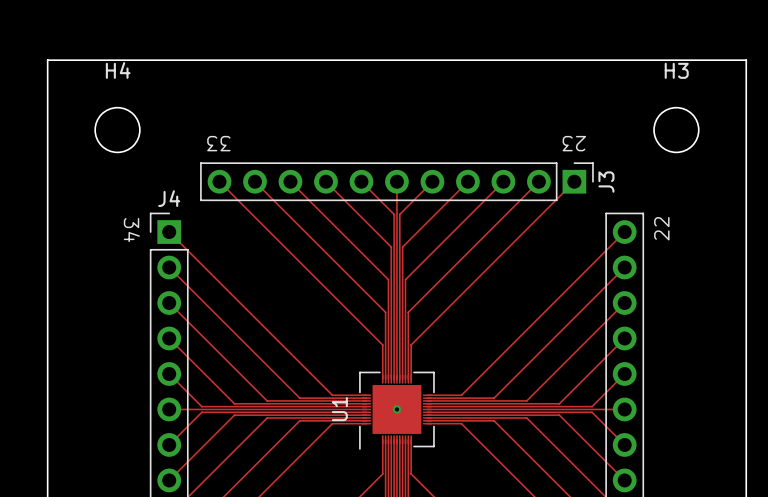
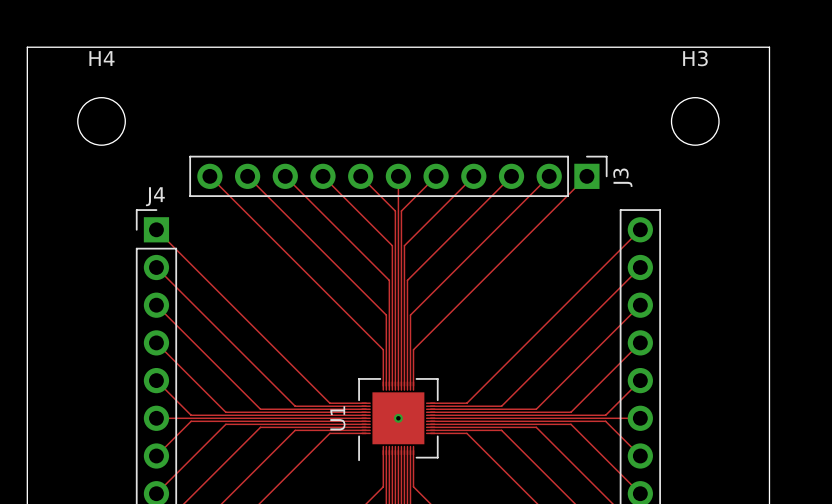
text: 33 (218, 143) -> none
text: 23 (574, 143) -> none
text: 22 (661, 228) -> none
text: 34 (131, 230) -> none

